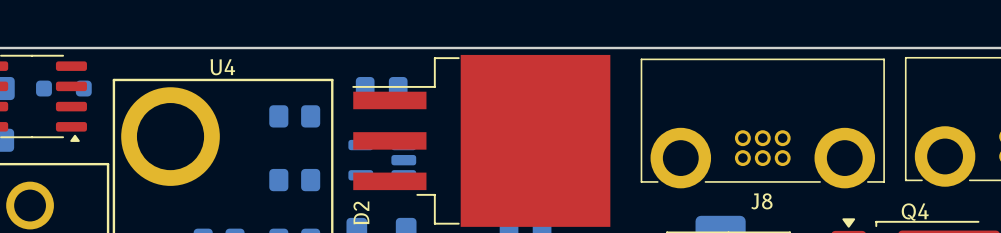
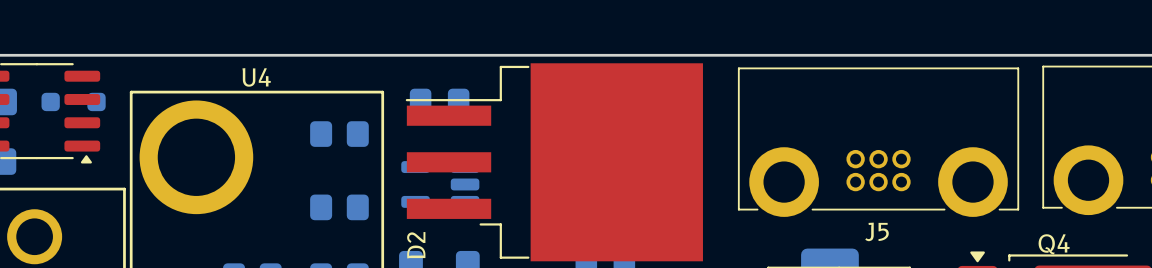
J8 name: J8 (761, 201) -> J5 (877, 231)

